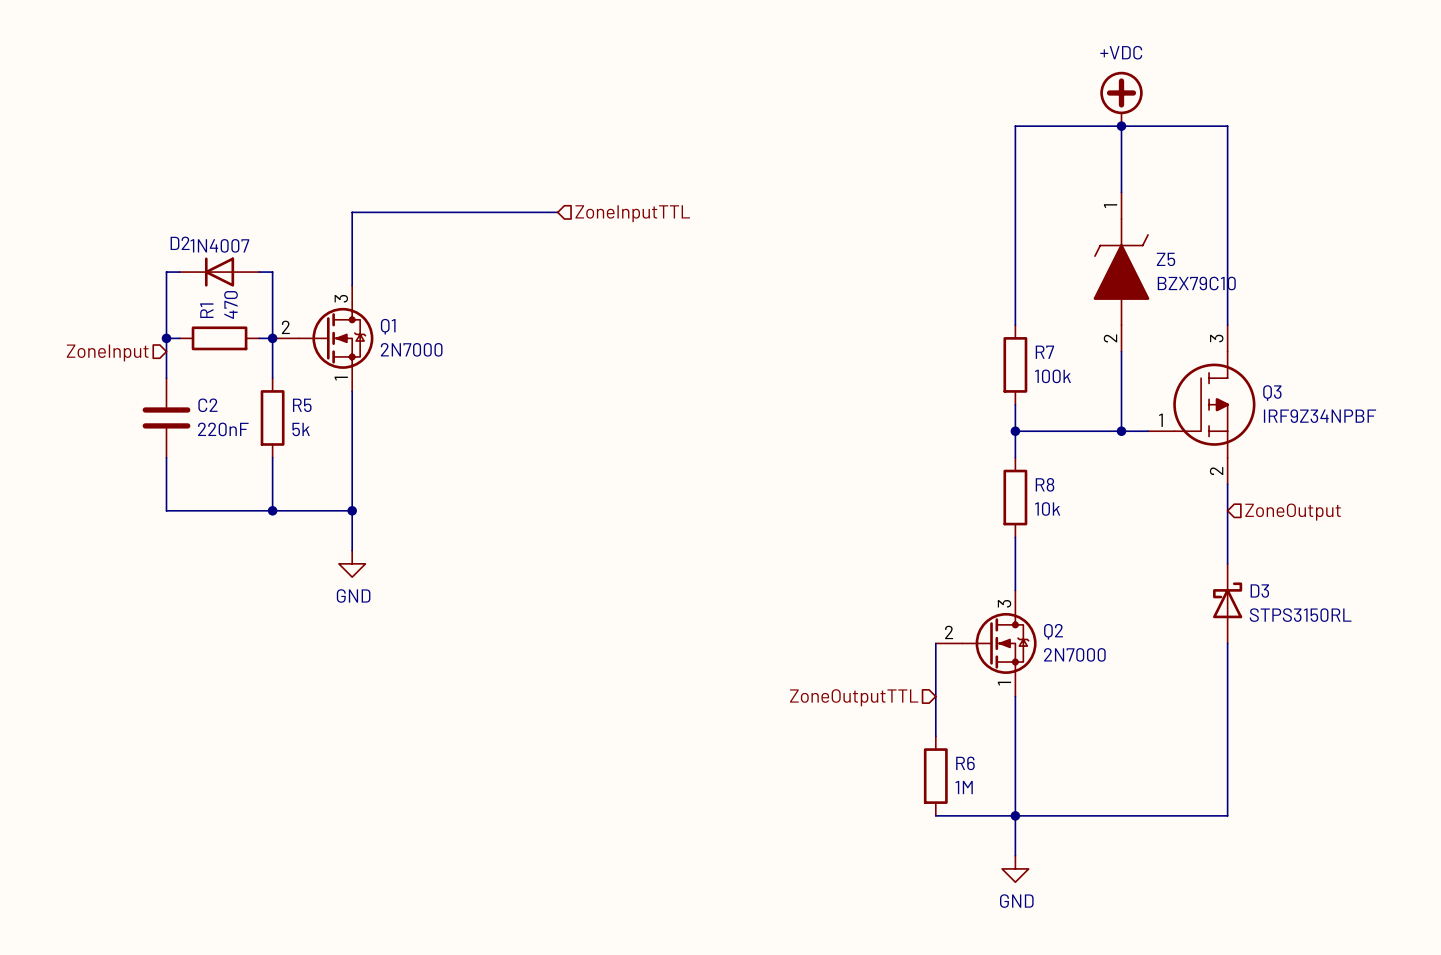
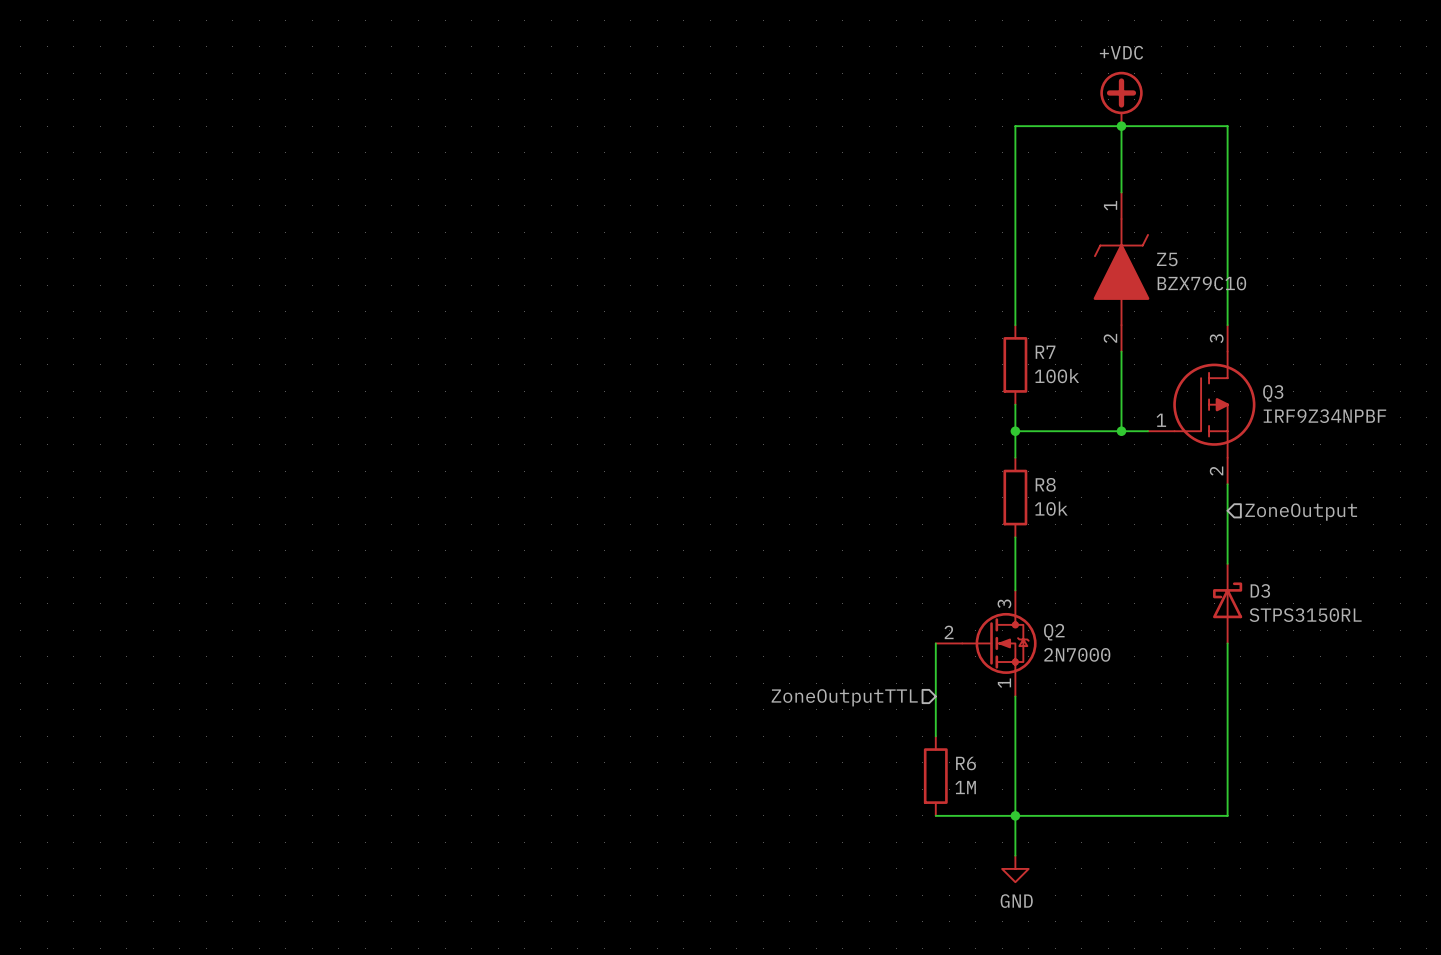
wire: (557, 212) (352, 212) (352, 285) -> none
hierarchical label: ZoneInputTTL (632, 213) -> none
wire: (179, 272) (166, 272) (166, 378) -> none
D2: 1N4007 (219, 272) -> none
wire: (259, 272) (272, 272) (272, 378) -> none
wire: (166, 338) (179, 338) -> none
junction: (166, 338) -> none
R1: 470 (219, 338) -> none
wire: (259, 338) (272, 338) -> none
junction: (272, 338) -> none
Q1: 2N7000 (323, 338) -> none
hierarchical label: ZoneInput (107, 352) -> none
wire: (352, 391) (352, 550) -> none
C2: 220nF (166, 417) -> none
R5: 5k (272, 417) -> none
wire: (166, 457) (166, 510) (352, 510) -> none
wire: (272, 457) (272, 510) -> none
junction: (272, 510) -> none
junction: (352, 510) -> none
power symbol: GND (352, 563) -> none

